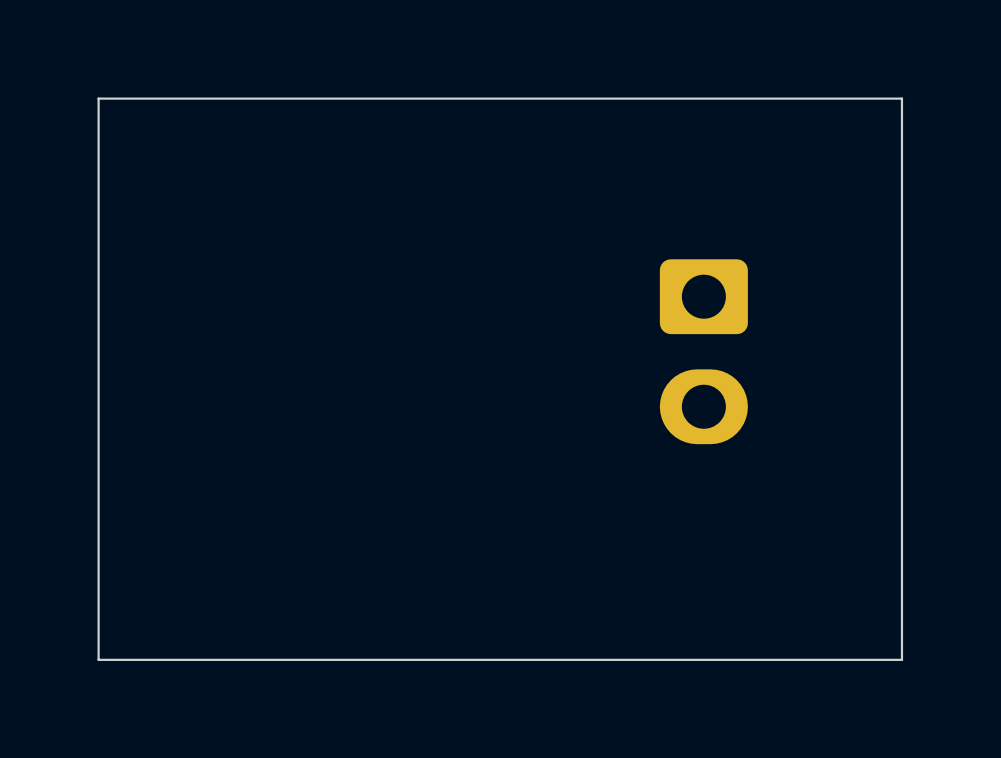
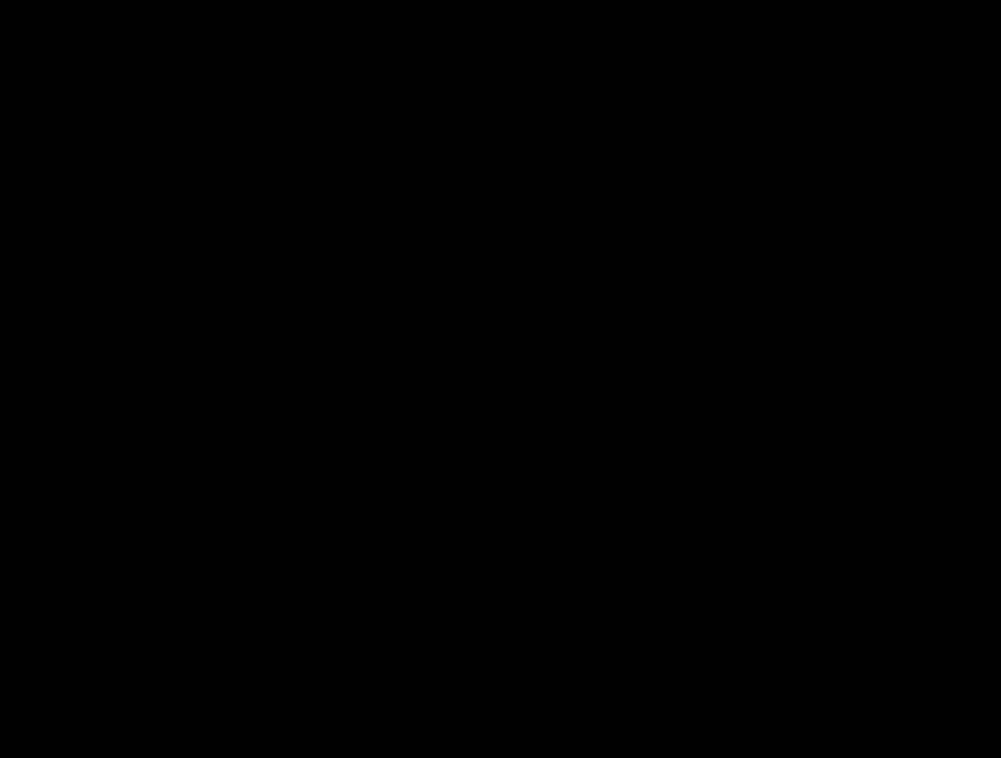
board edge: (98, 98) (901, 98) (901, 659) (98, 659) (98, 98) -> none
part: (703, 351) -> none

